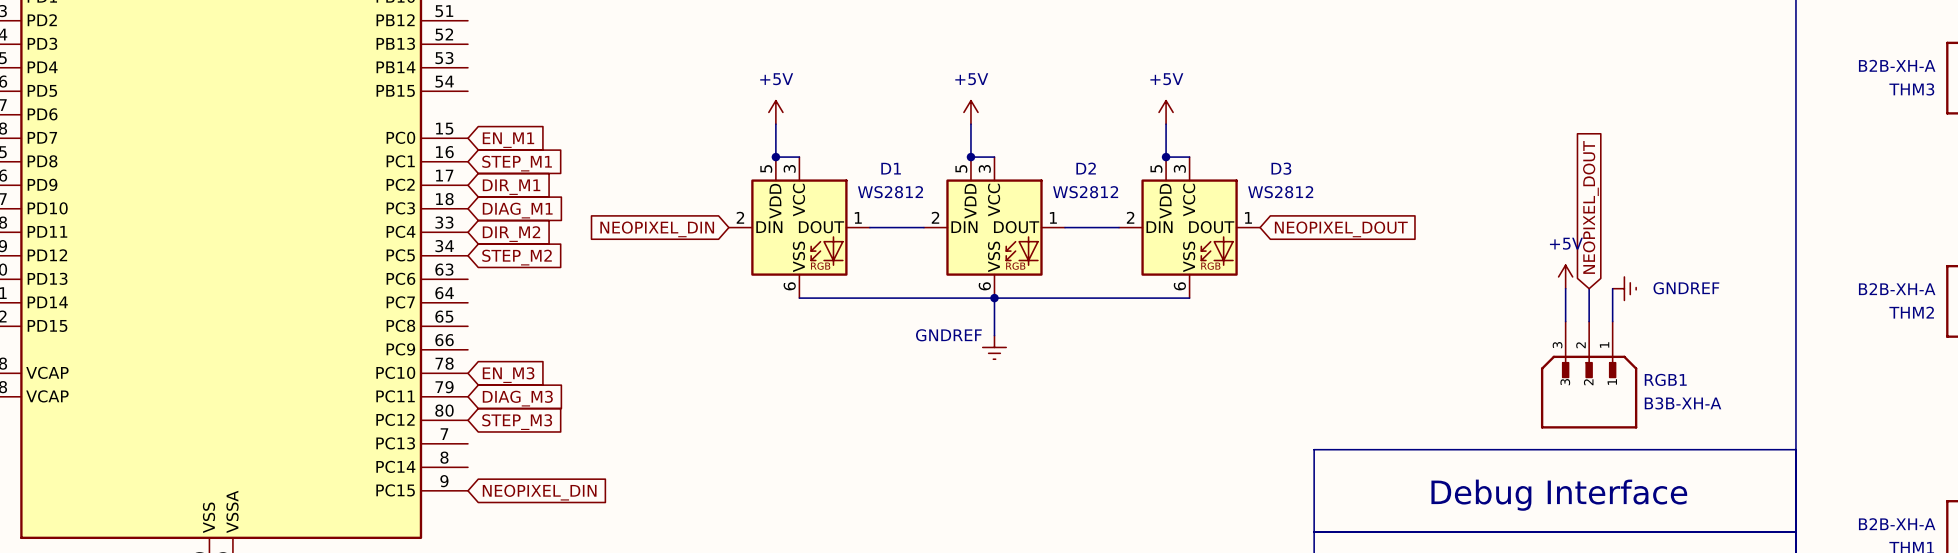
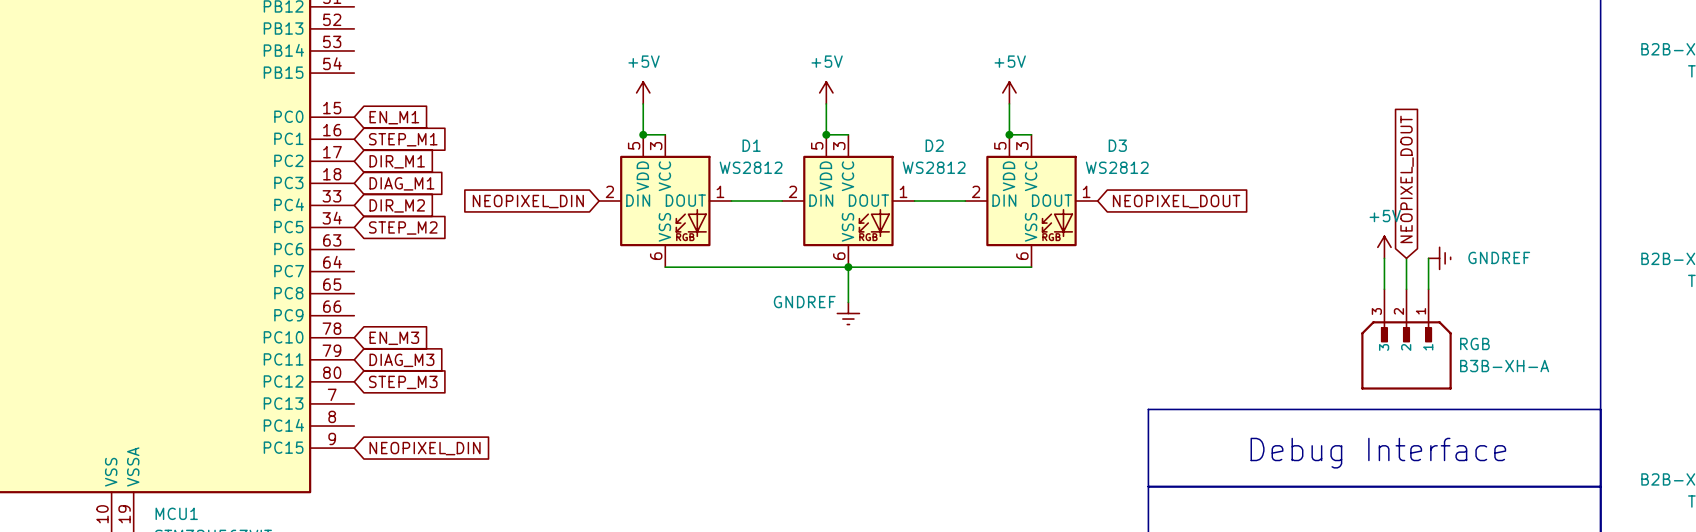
RGB1 name: RGB1 (1665, 379) -> RGB (1474, 343)

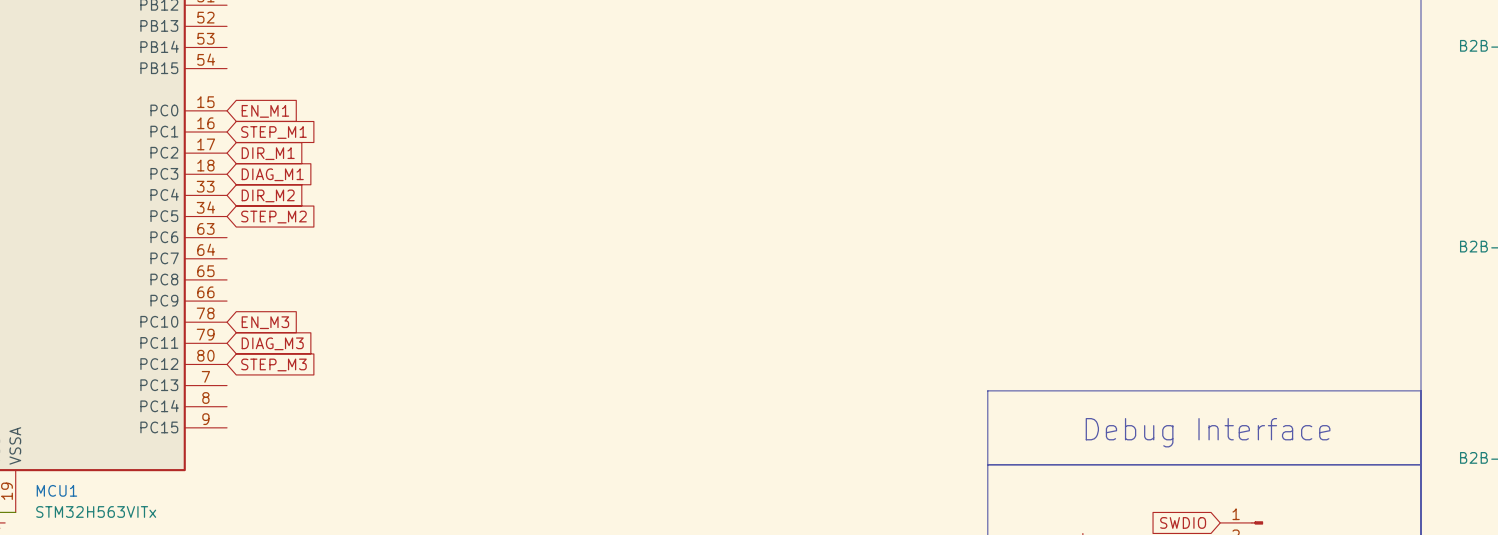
power symbol: +5V (643, 92) -> none
power symbol: +5V (826, 92) -> none
power symbol: +5V (1009, 92) -> none
wire: (643, 103) (643, 134) (665, 134) -> none
wire: (826, 103) (826, 134) (848, 134) -> none
wire: (1009, 103) (1009, 134) (1031, 134) -> none
junction: (643, 134) -> none
junction: (826, 134) -> none
junction: (1009, 134) -> none
global label: NEOPIXEL_DOUT (1407, 179) -> none
D1: WS2812 (665, 200) -> none
wire: (731, 200) (782, 200) -> none
D2: WS2812 (848, 200) -> none
wire: (914, 200) (965, 200) -> none
D3: WS2812 (1031, 200) -> none
global label: NEOPIXEL_DIN (528, 201) -> none
global label: NEOPIXEL_DOUT (1176, 201) -> none
power symbol: +5V (1384, 247) -> none
wire: (1384, 258) (1384, 289) -> none
wire: (1406, 258) (1406, 289) -> none
wire: (1428, 258) (1428, 289) -> none
power symbol: GNDREF (1439, 258) -> none
wire: (665, 267) (1031, 267) -> none
wire: (848, 267) (848, 302) -> none
junction: (848, 267) -> none
power symbol: GNDREF (848, 313) -> none
RGB: B3B-XH-A (1406, 339) -> none
global label: NEOPIXEL_DIN (425, 448) -> none

